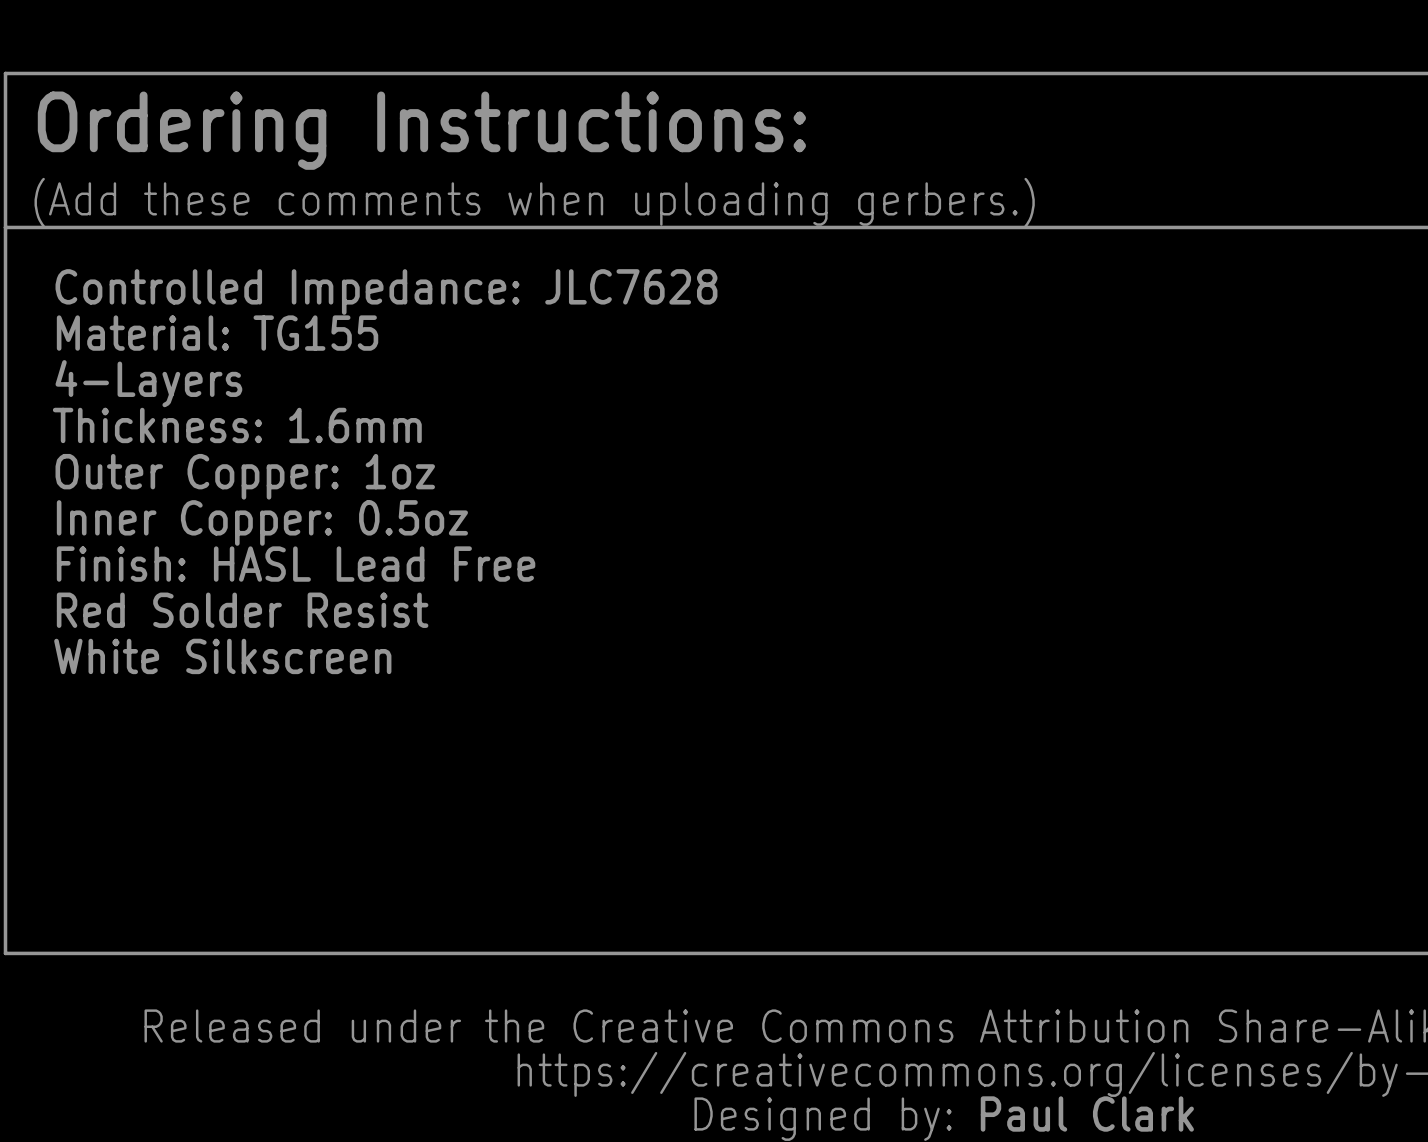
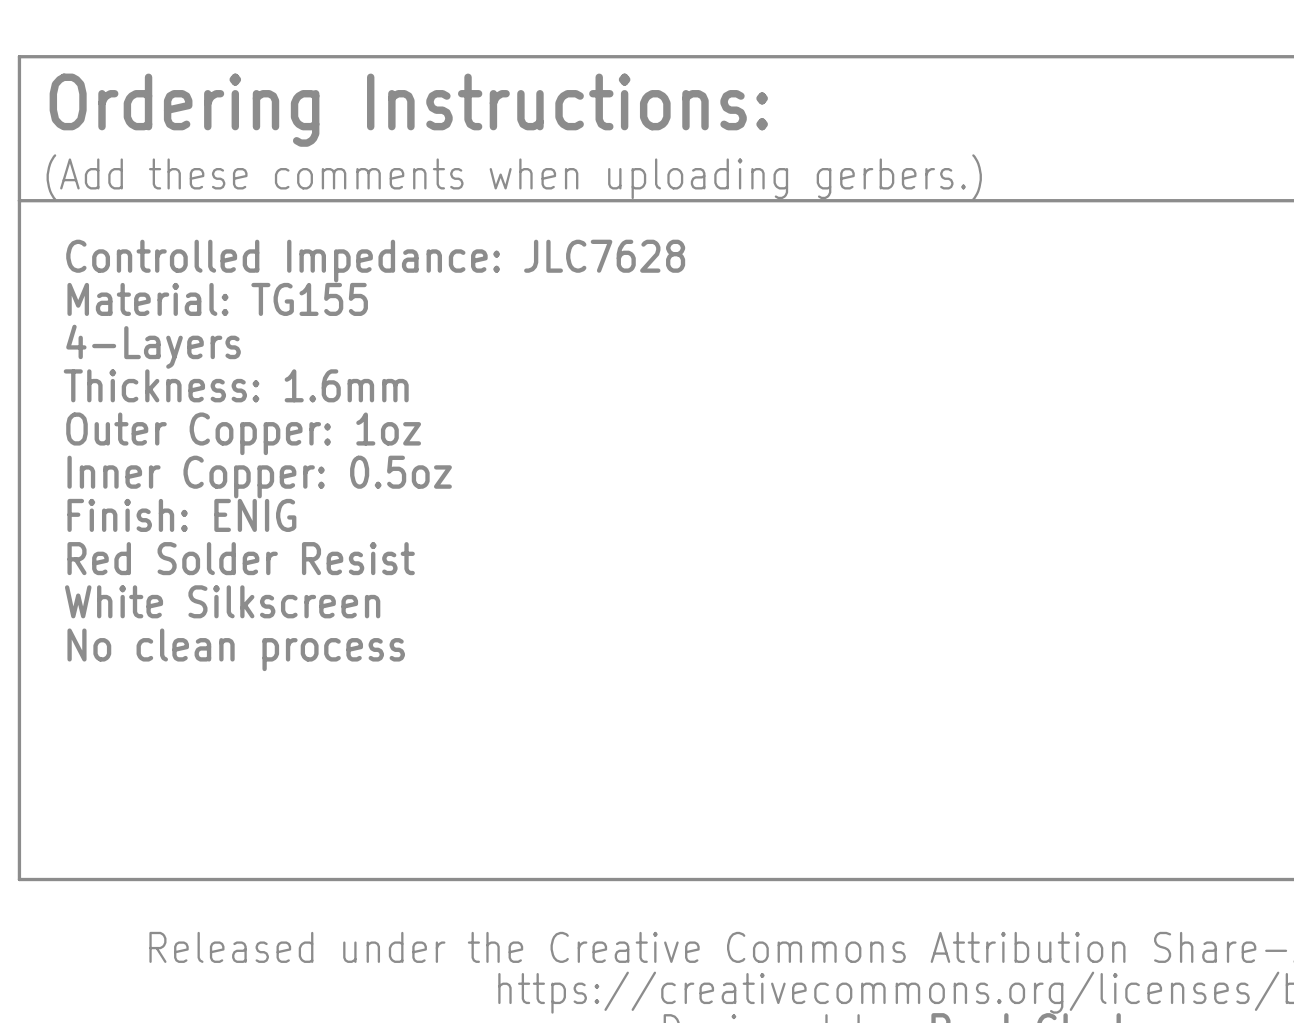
text: Finish: HASL Lead Free (296, 564) -> Finish: ENIG (181, 515)
text: none -> No clean process (236, 649)

